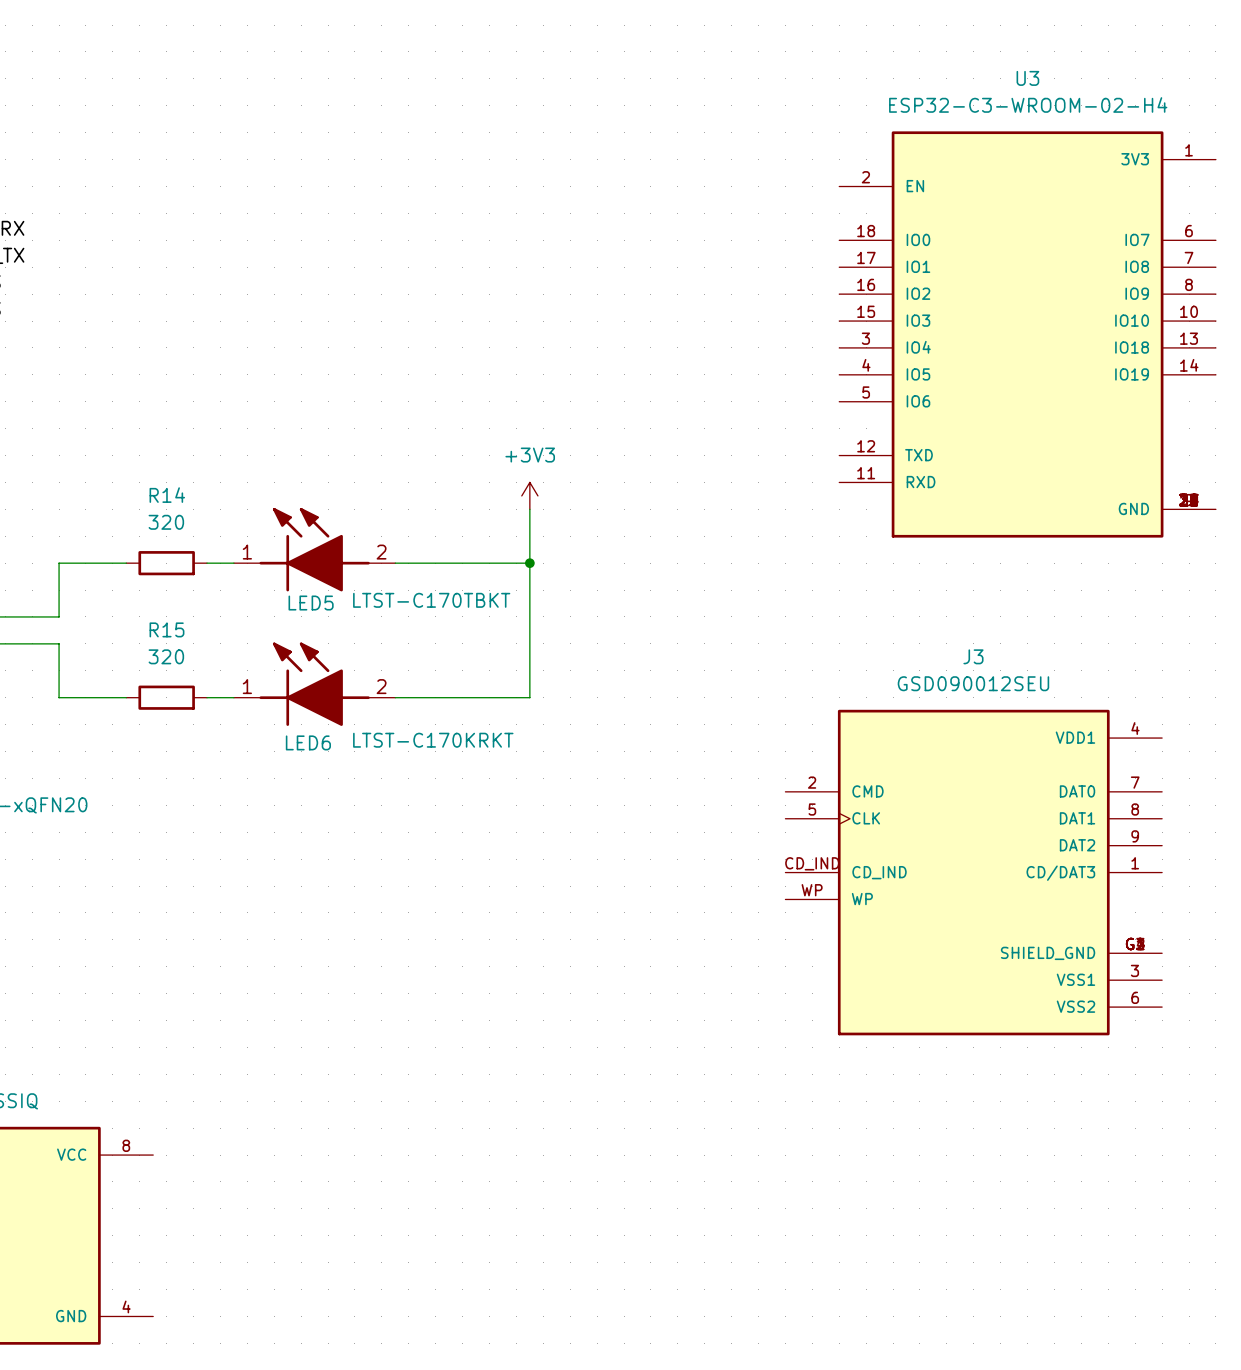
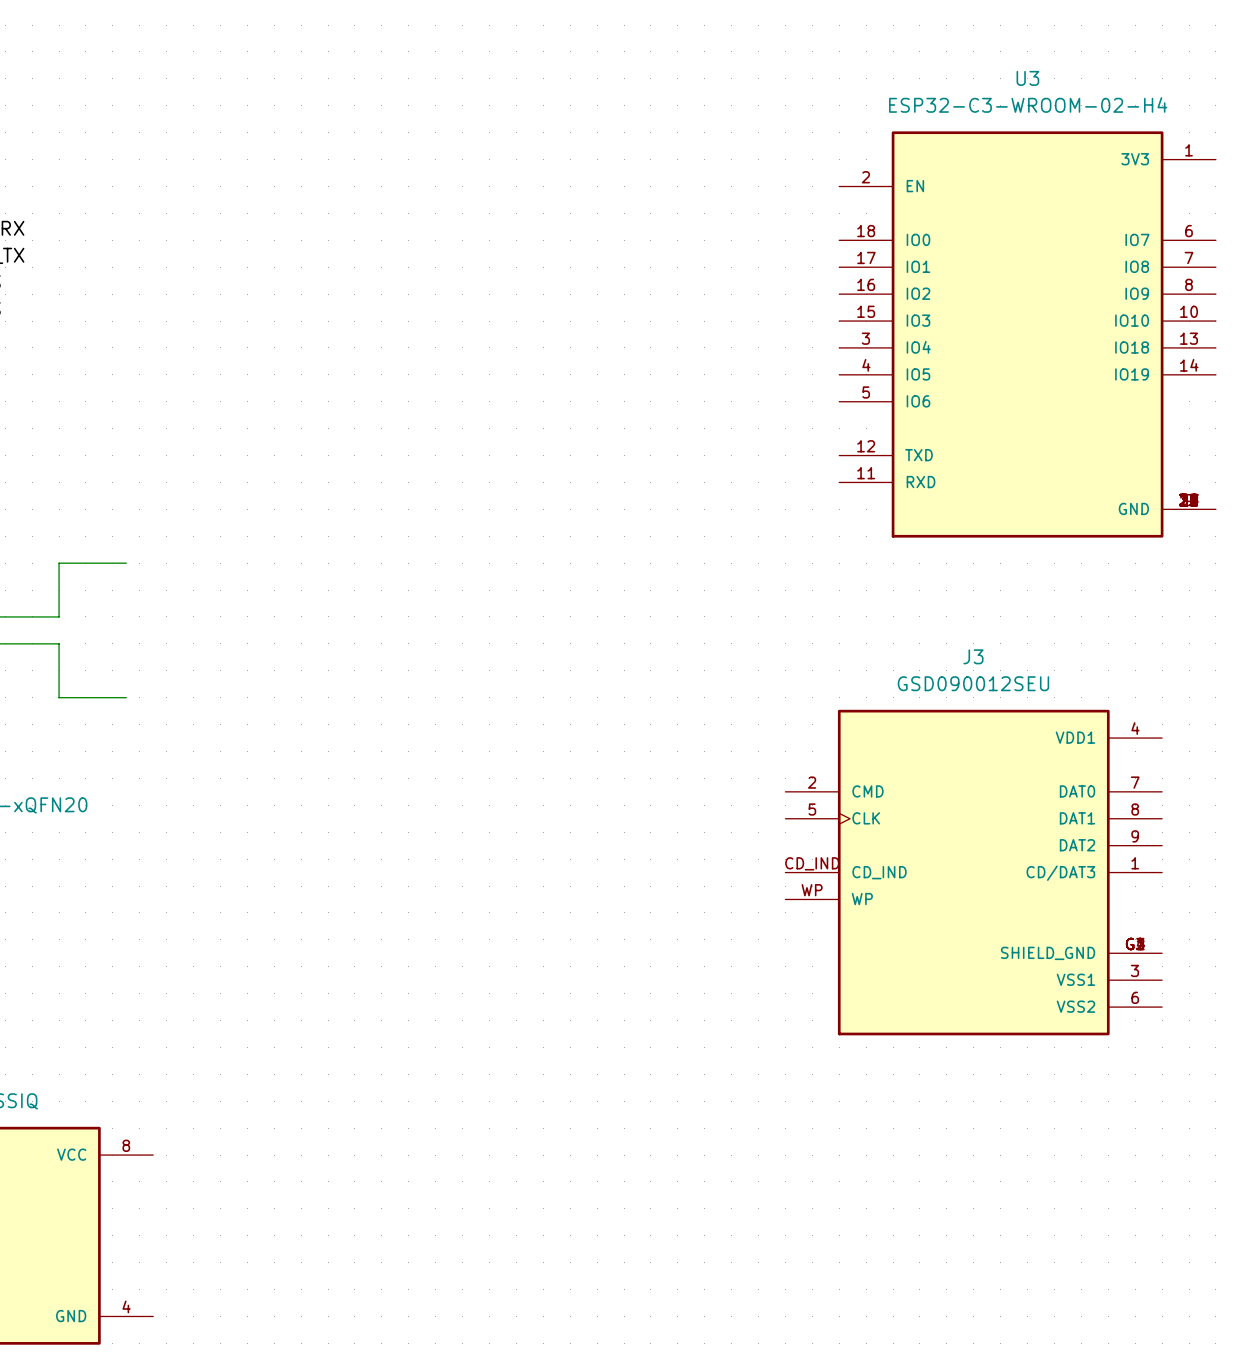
power symbol: +3V3 (529, 495) -> none
wire: (529, 509) (529, 697) (395, 697) -> none
LED5: LTST-C170TBKT (314, 549) -> none
R14: 320 (166, 563) -> none
wire: (207, 563) (233, 563) -> none
wire: (395, 563) (529, 563) -> none
junction: (529, 563) -> none
LED6: LTST-C170KRKT (314, 684) -> none
R15: 320 (166, 697) -> none
wire: (207, 697) (233, 697) -> none

